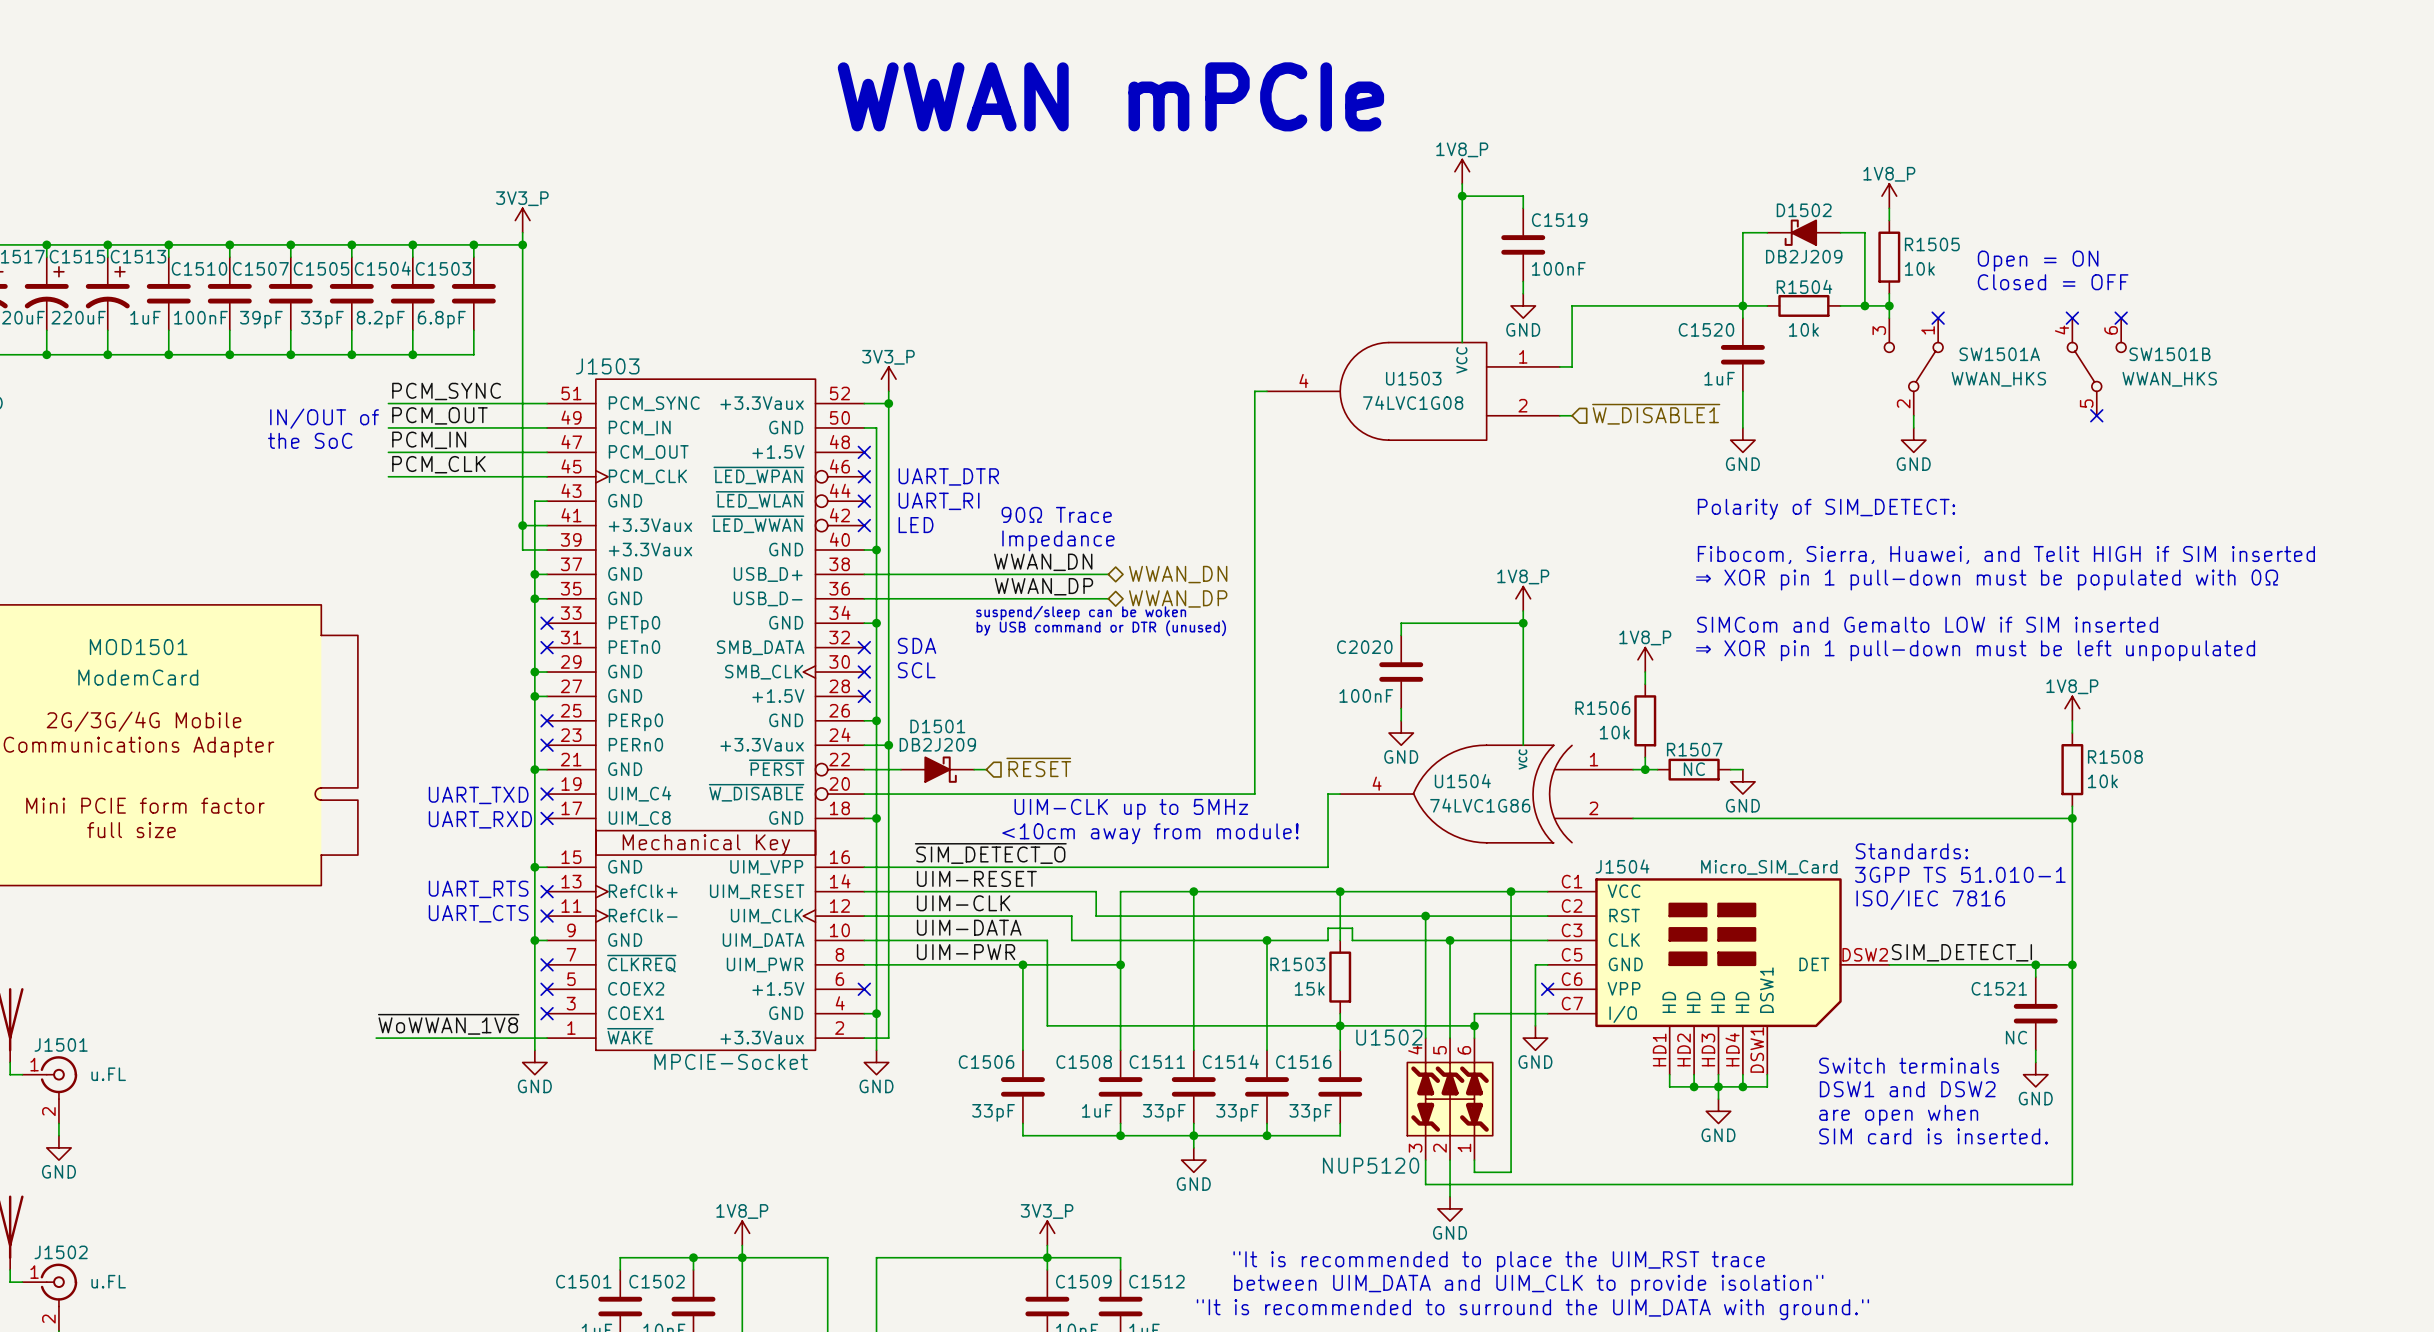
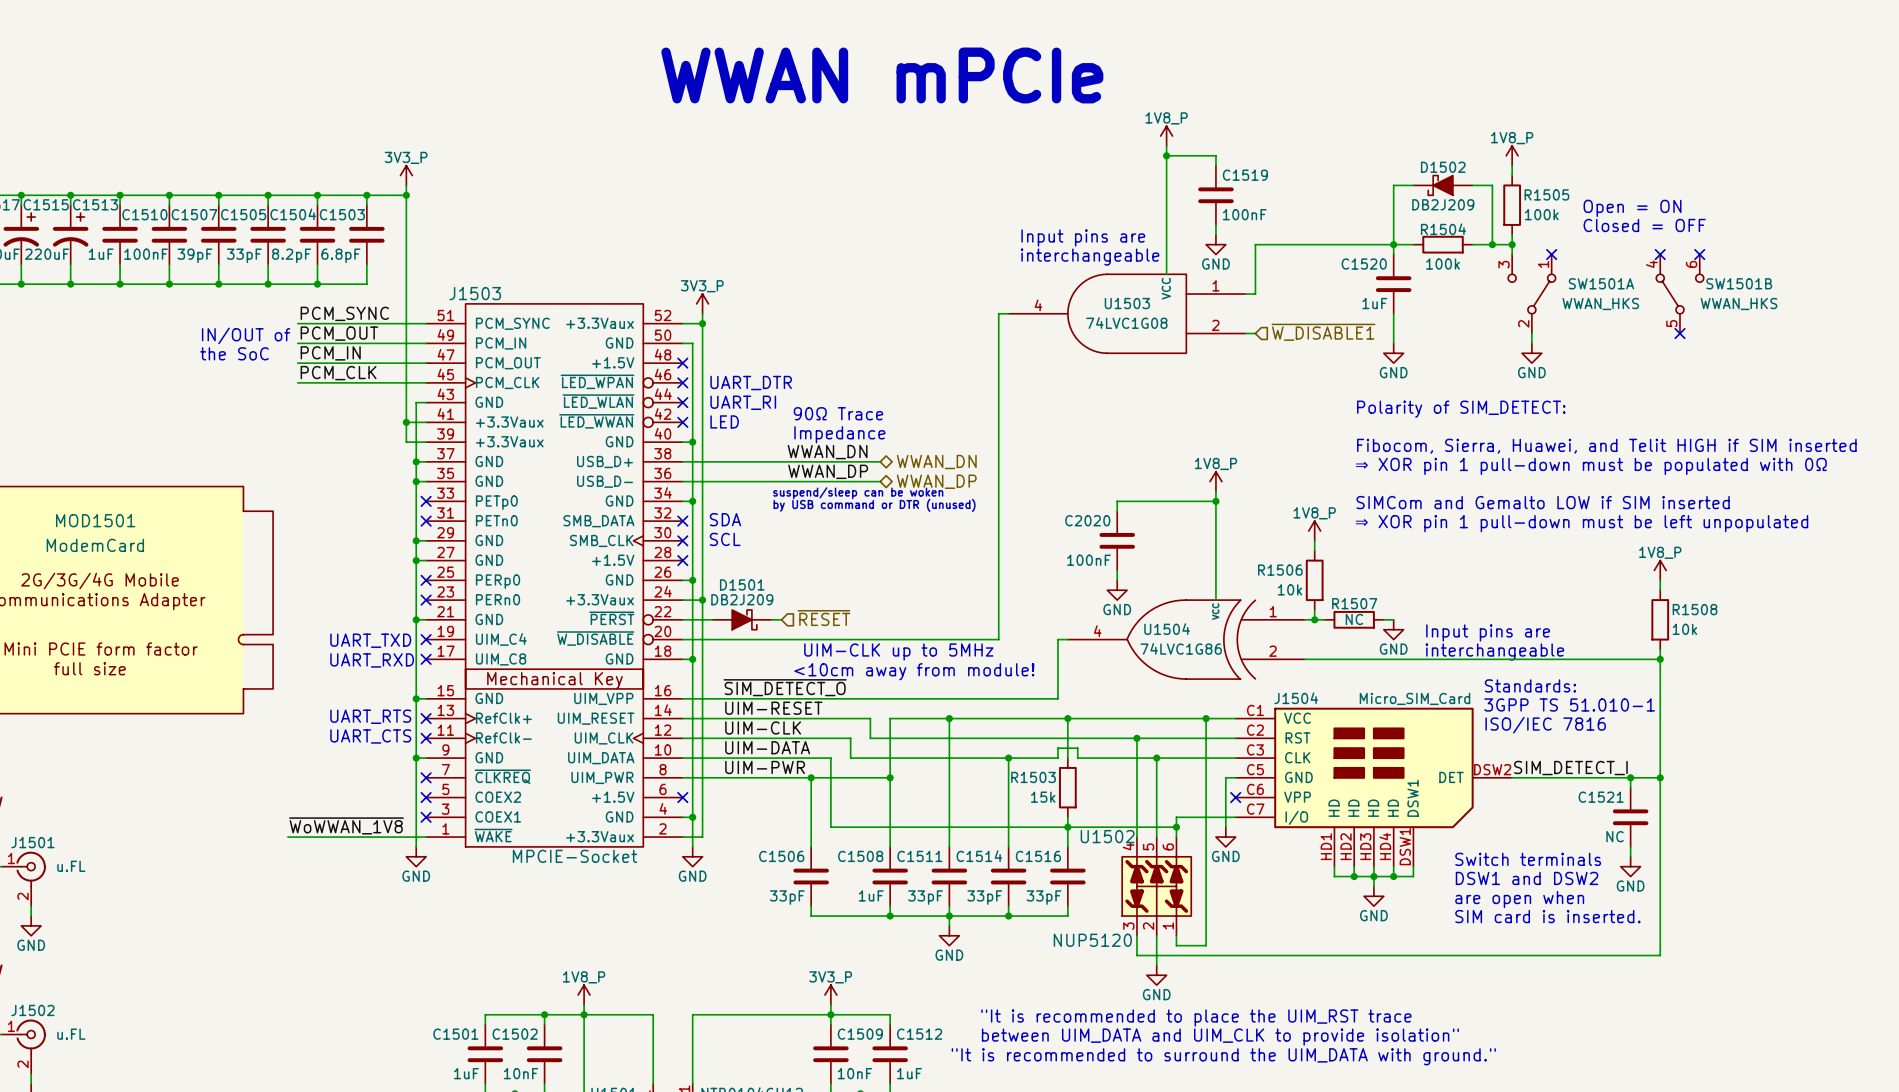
R1505 value: 10k (1919, 268) -> 100k (1541, 214)
text: none -> Input pins are (1083, 237)
text: none -> interchangeable (1090, 257)
R1504 value: 10k (1803, 329) -> 100k (1443, 264)
text: none -> Input pins are (1488, 632)
text: none -> interchangeable (1494, 651)

